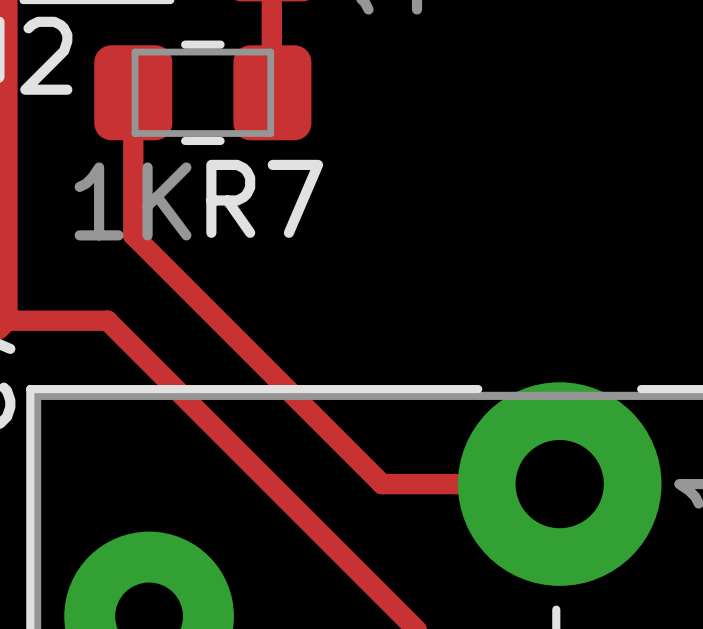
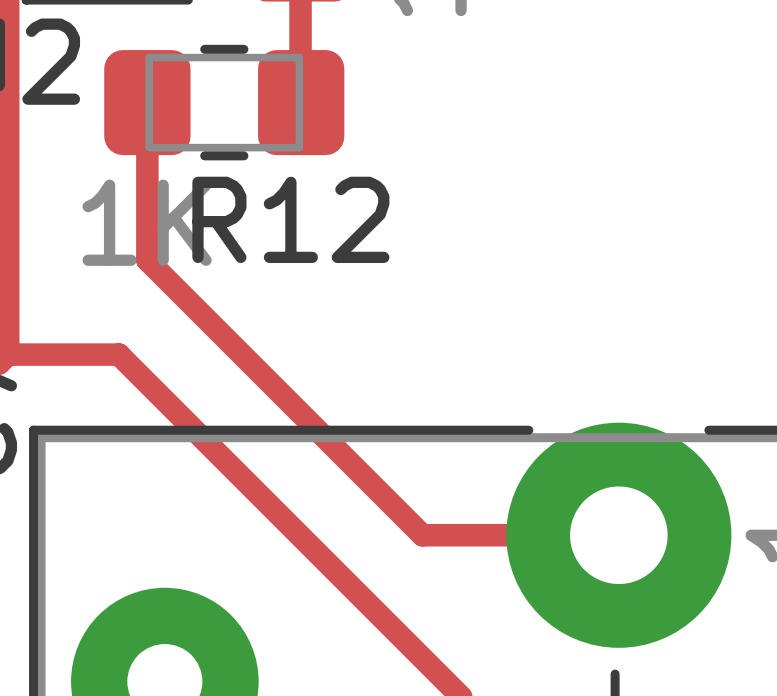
R7 name: R7 (264, 198) -> R12 (290, 219)

